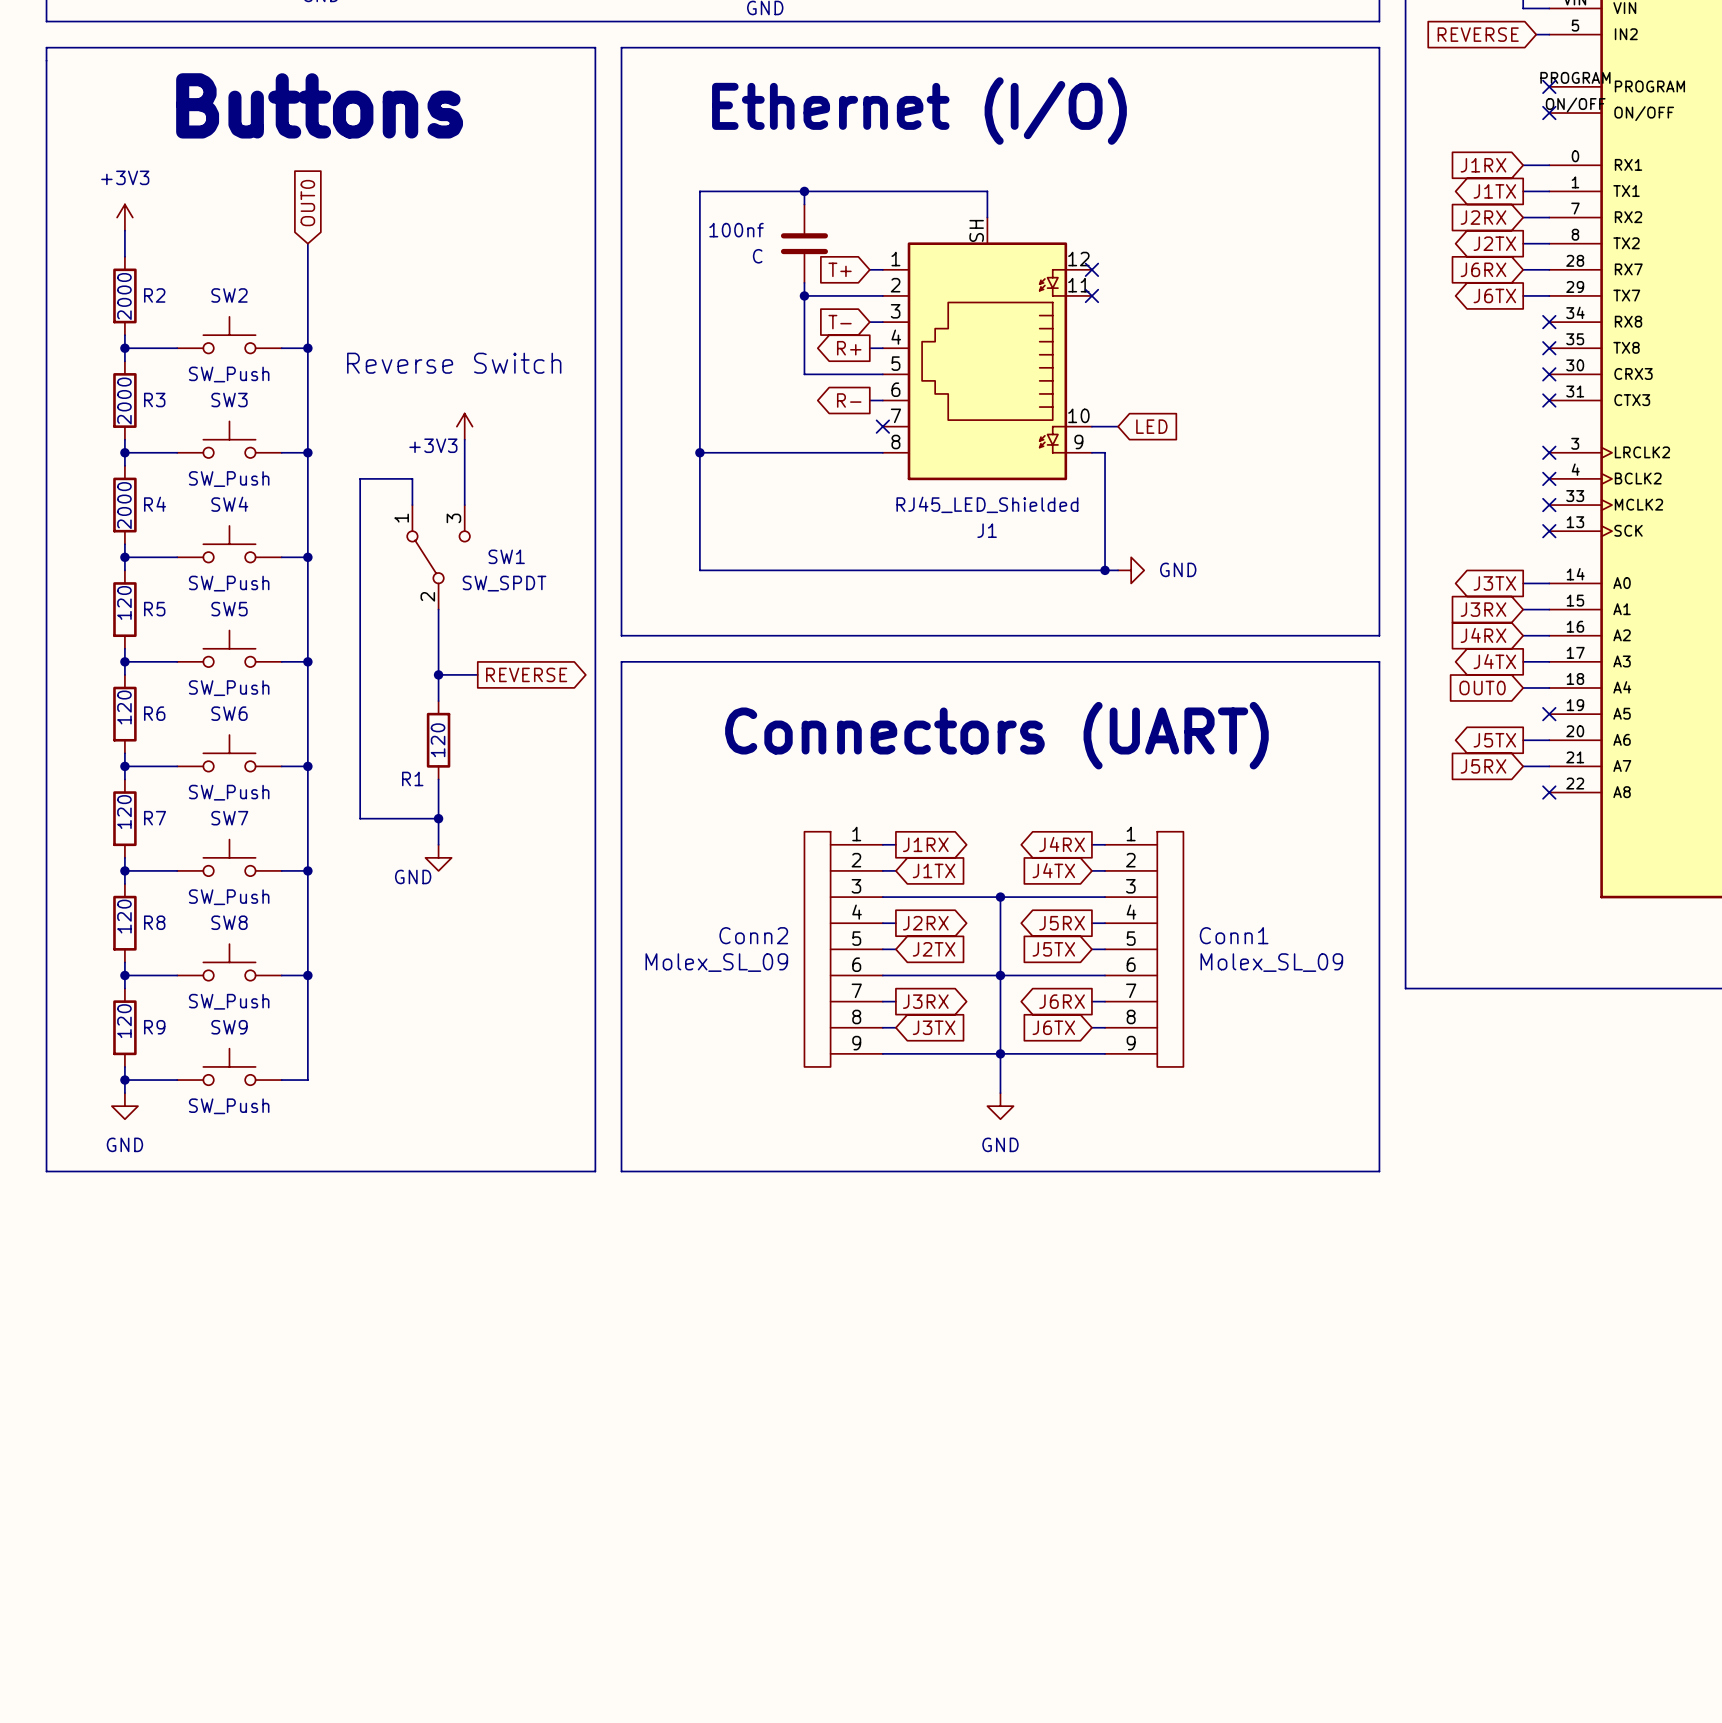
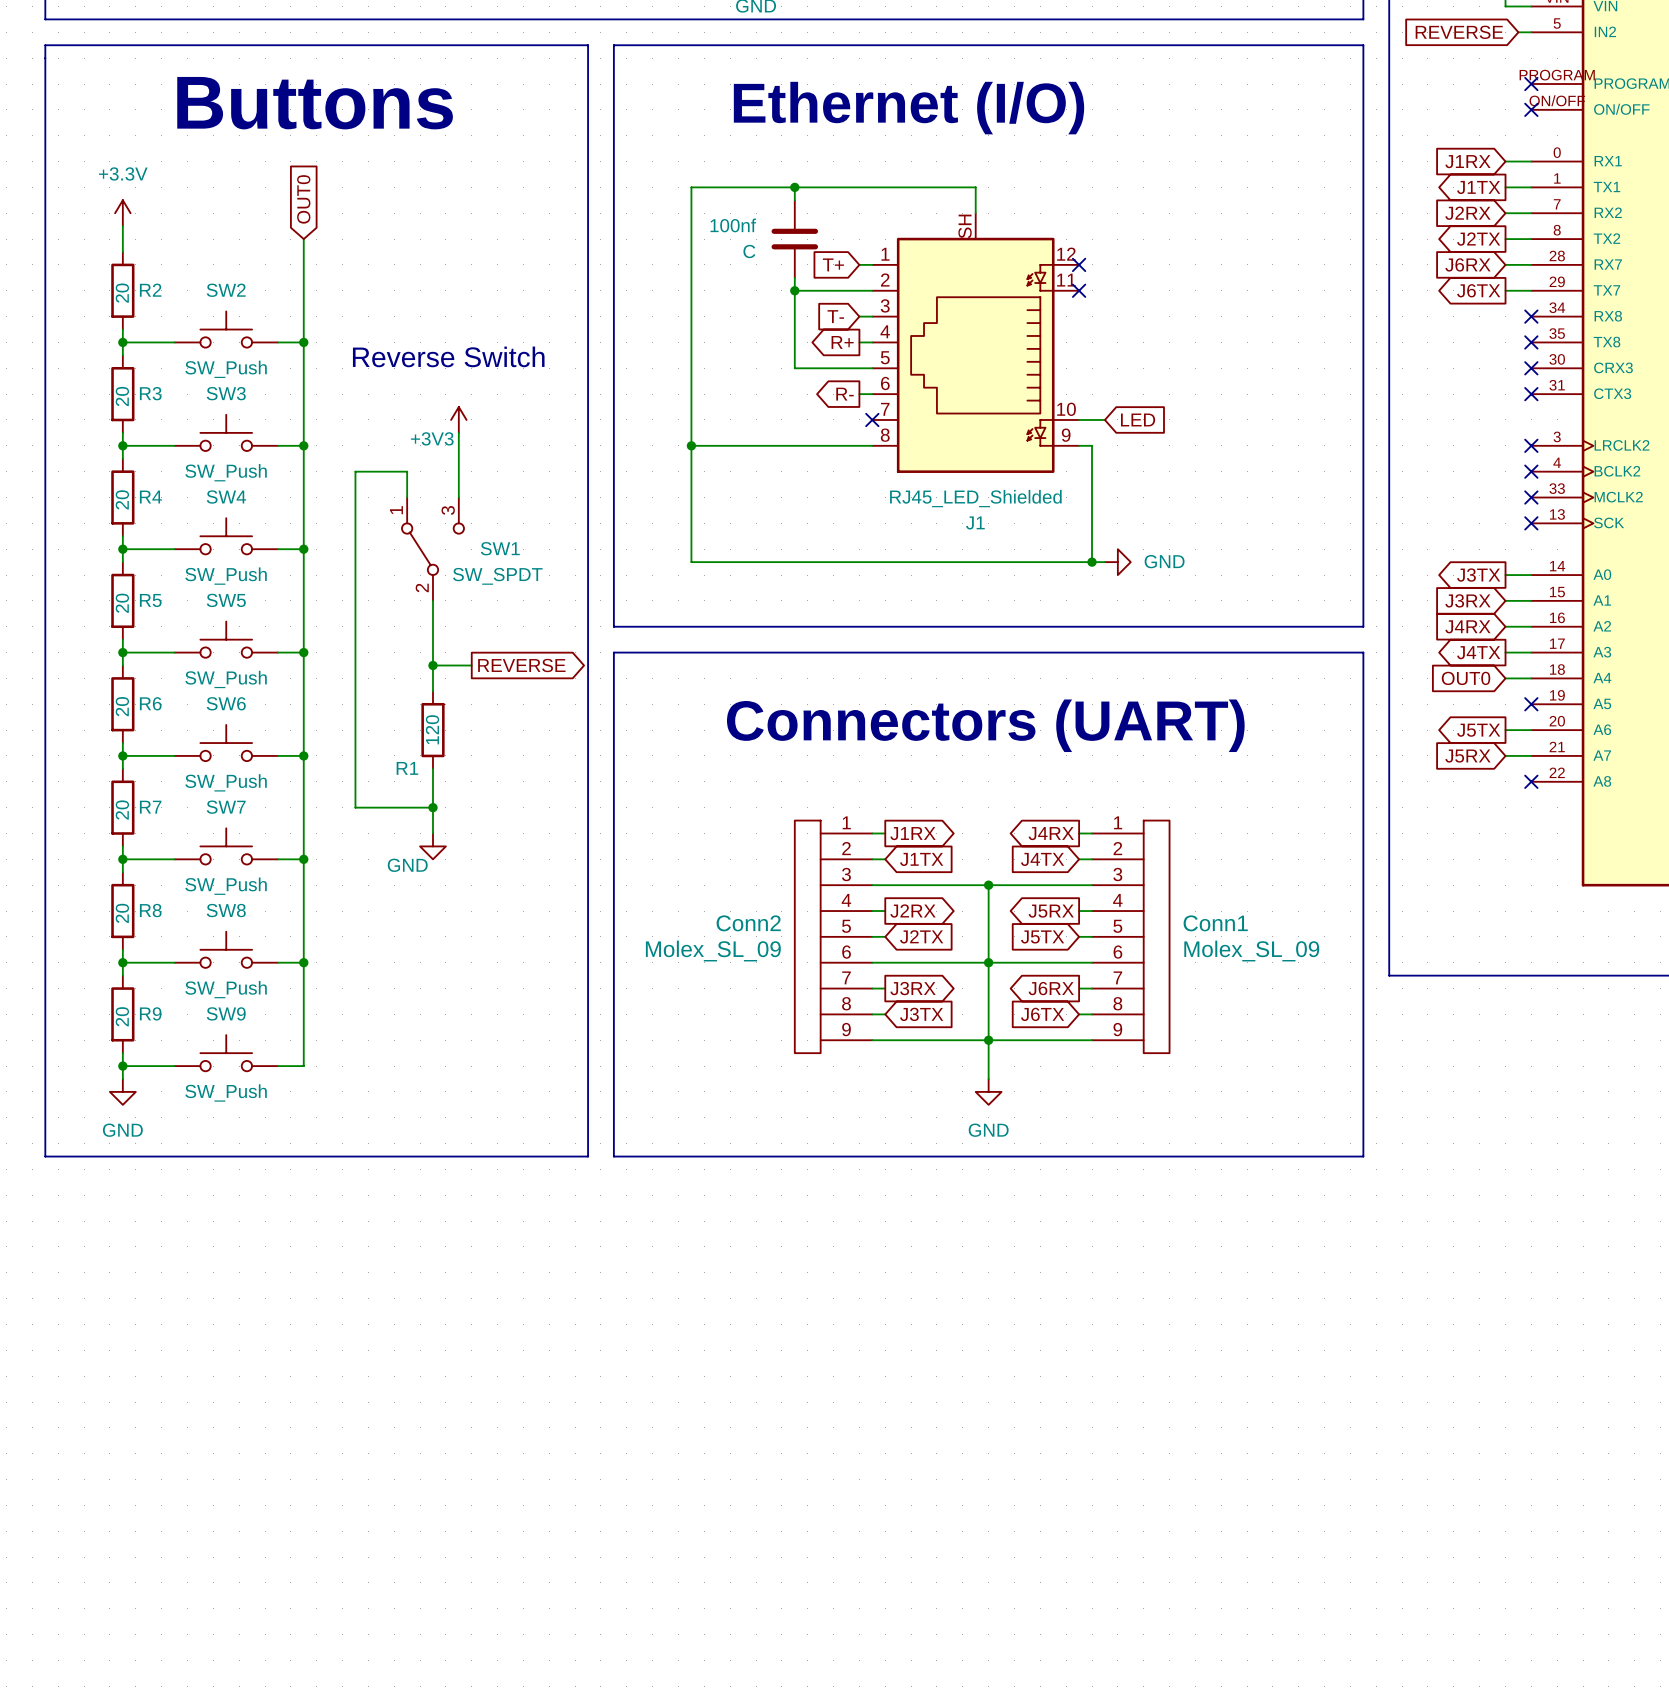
power symbol: +3V3 (124, 217) -> +3.3V (122, 213)
R2 value: 2000 (124, 296) -> 20 (122, 293)
R3 value: 2000 (124, 401) -> 20 (122, 396)
R4 value: 2000 (124, 505) -> 20 (122, 499)
R5 value: 120 (124, 602) -> 20 (122, 603)
R6 value: 120 (124, 707) -> 20 (122, 706)
R7 value: 120 (124, 812) -> 20 (122, 810)
R8 value: 120 (124, 916) -> 20 (122, 913)
R9 value: 120 (124, 1021) -> 20 (122, 1016)

